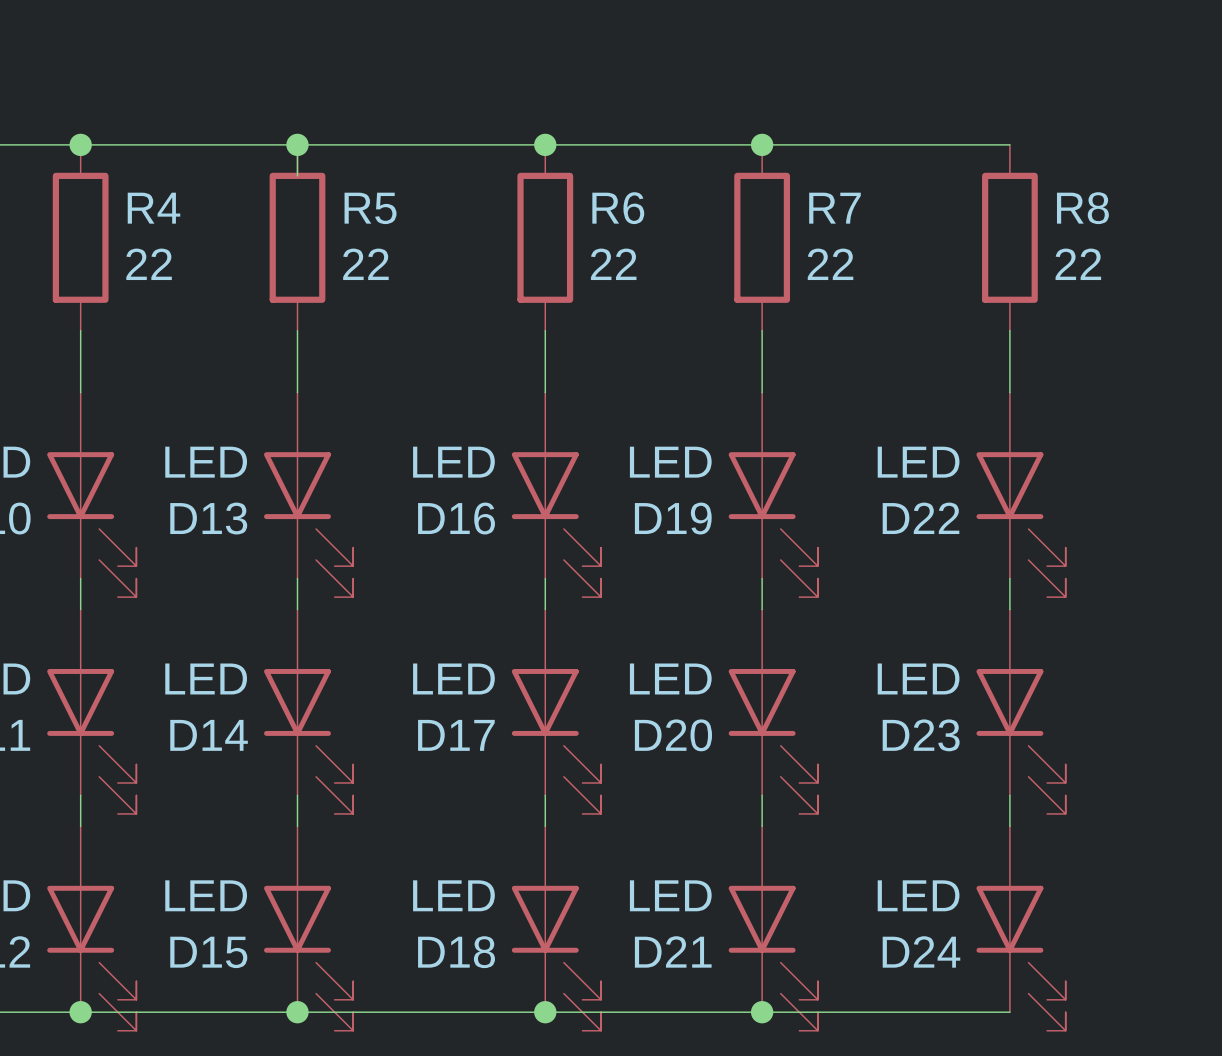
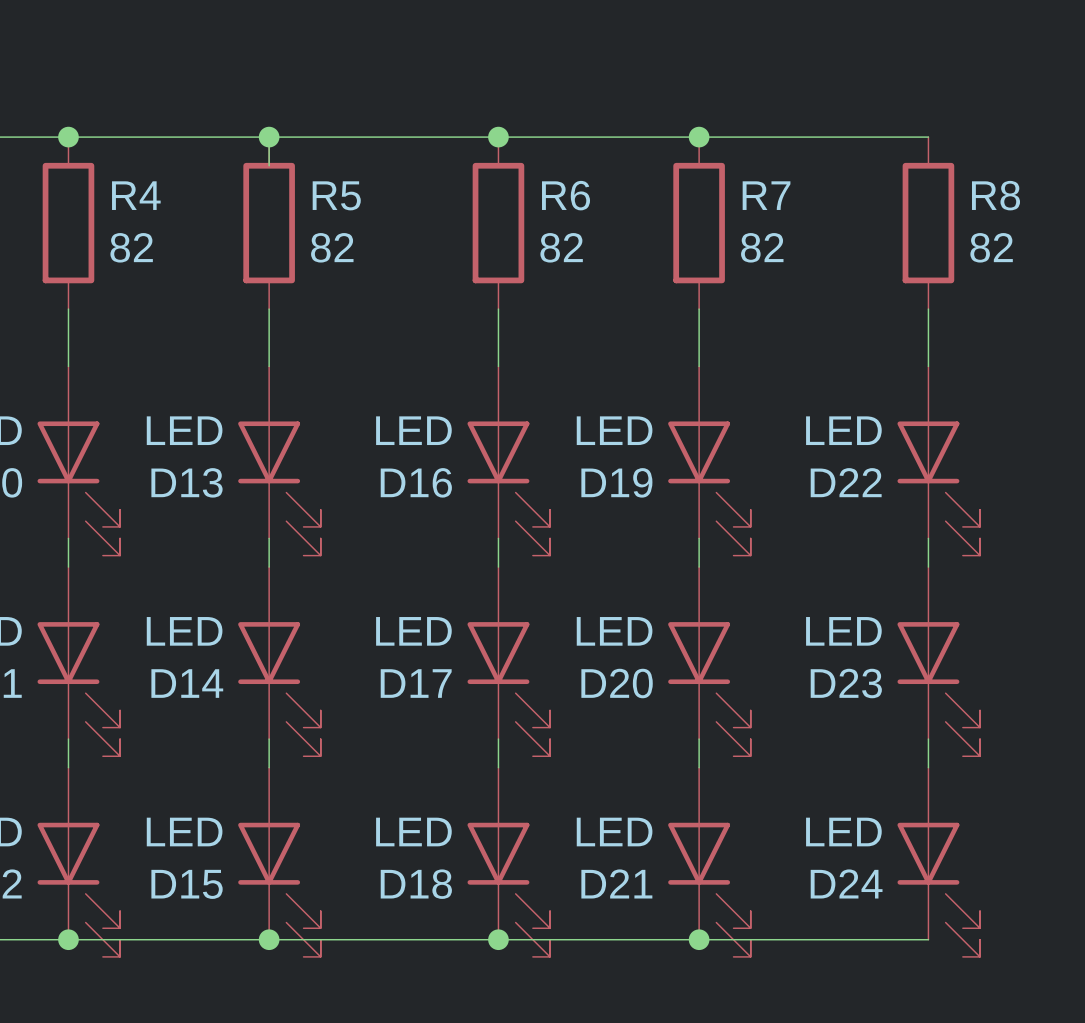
R4 value: 22 (149, 264) -> 82 (131, 247)
R5 value: 22 (365, 264) -> 82 (332, 247)
R6 value: 22 (613, 264) -> 82 (561, 247)
R7 value: 22 (830, 264) -> 82 (762, 247)
R8 value: 22 (1078, 264) -> 82 (991, 247)

